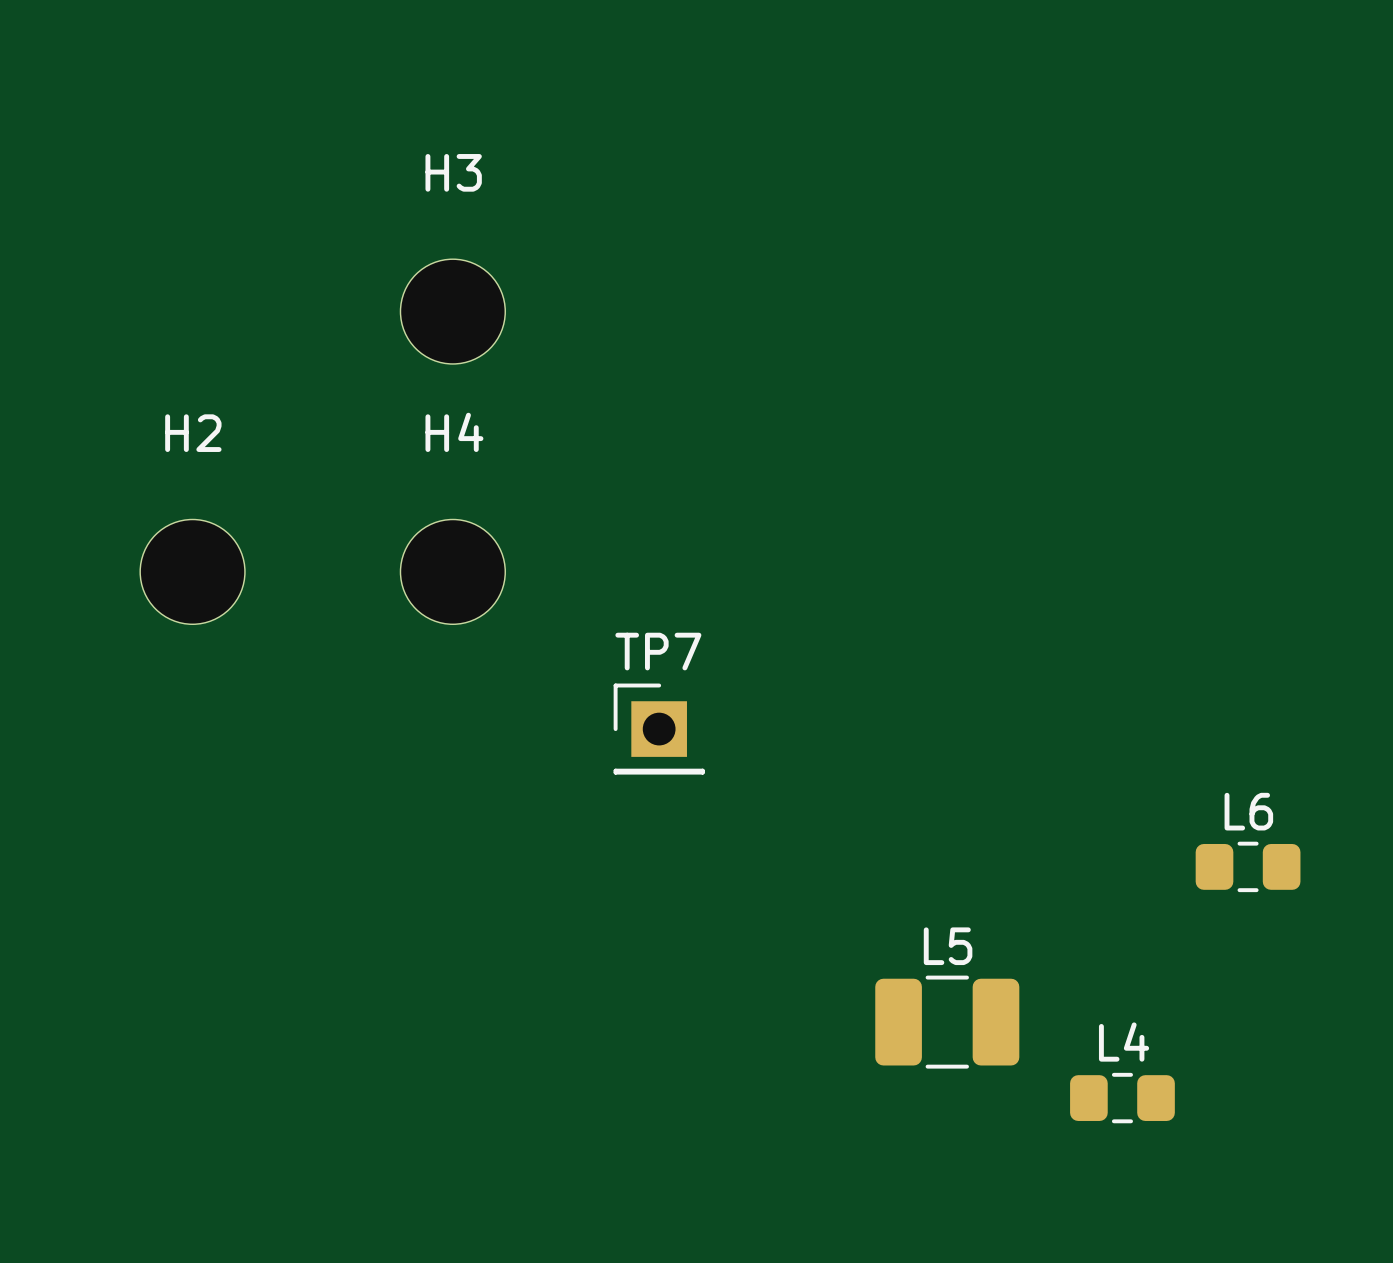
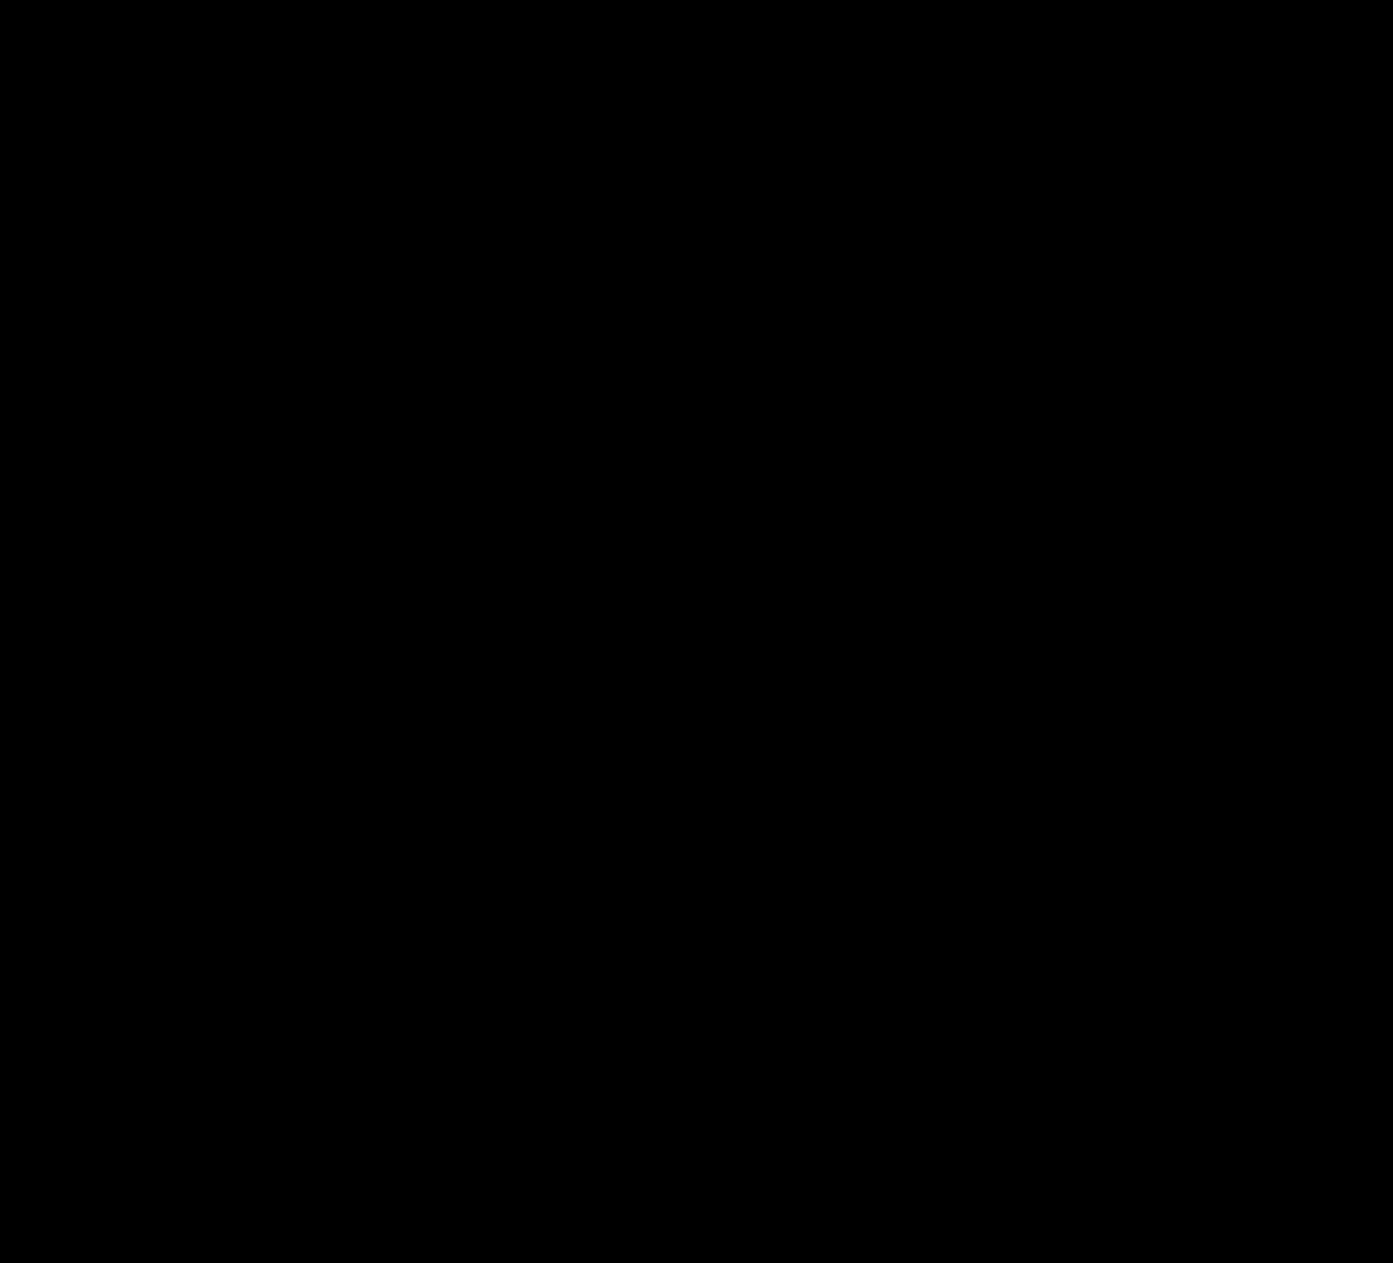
H3: (452, 311) -> none
H2: (192, 571) -> none
H4: (452, 571) -> none
TP7: (659, 729) -> none
L6: (1248, 866) -> none
L5: (947, 1022) -> none
L4: (1122, 1098) -> none

